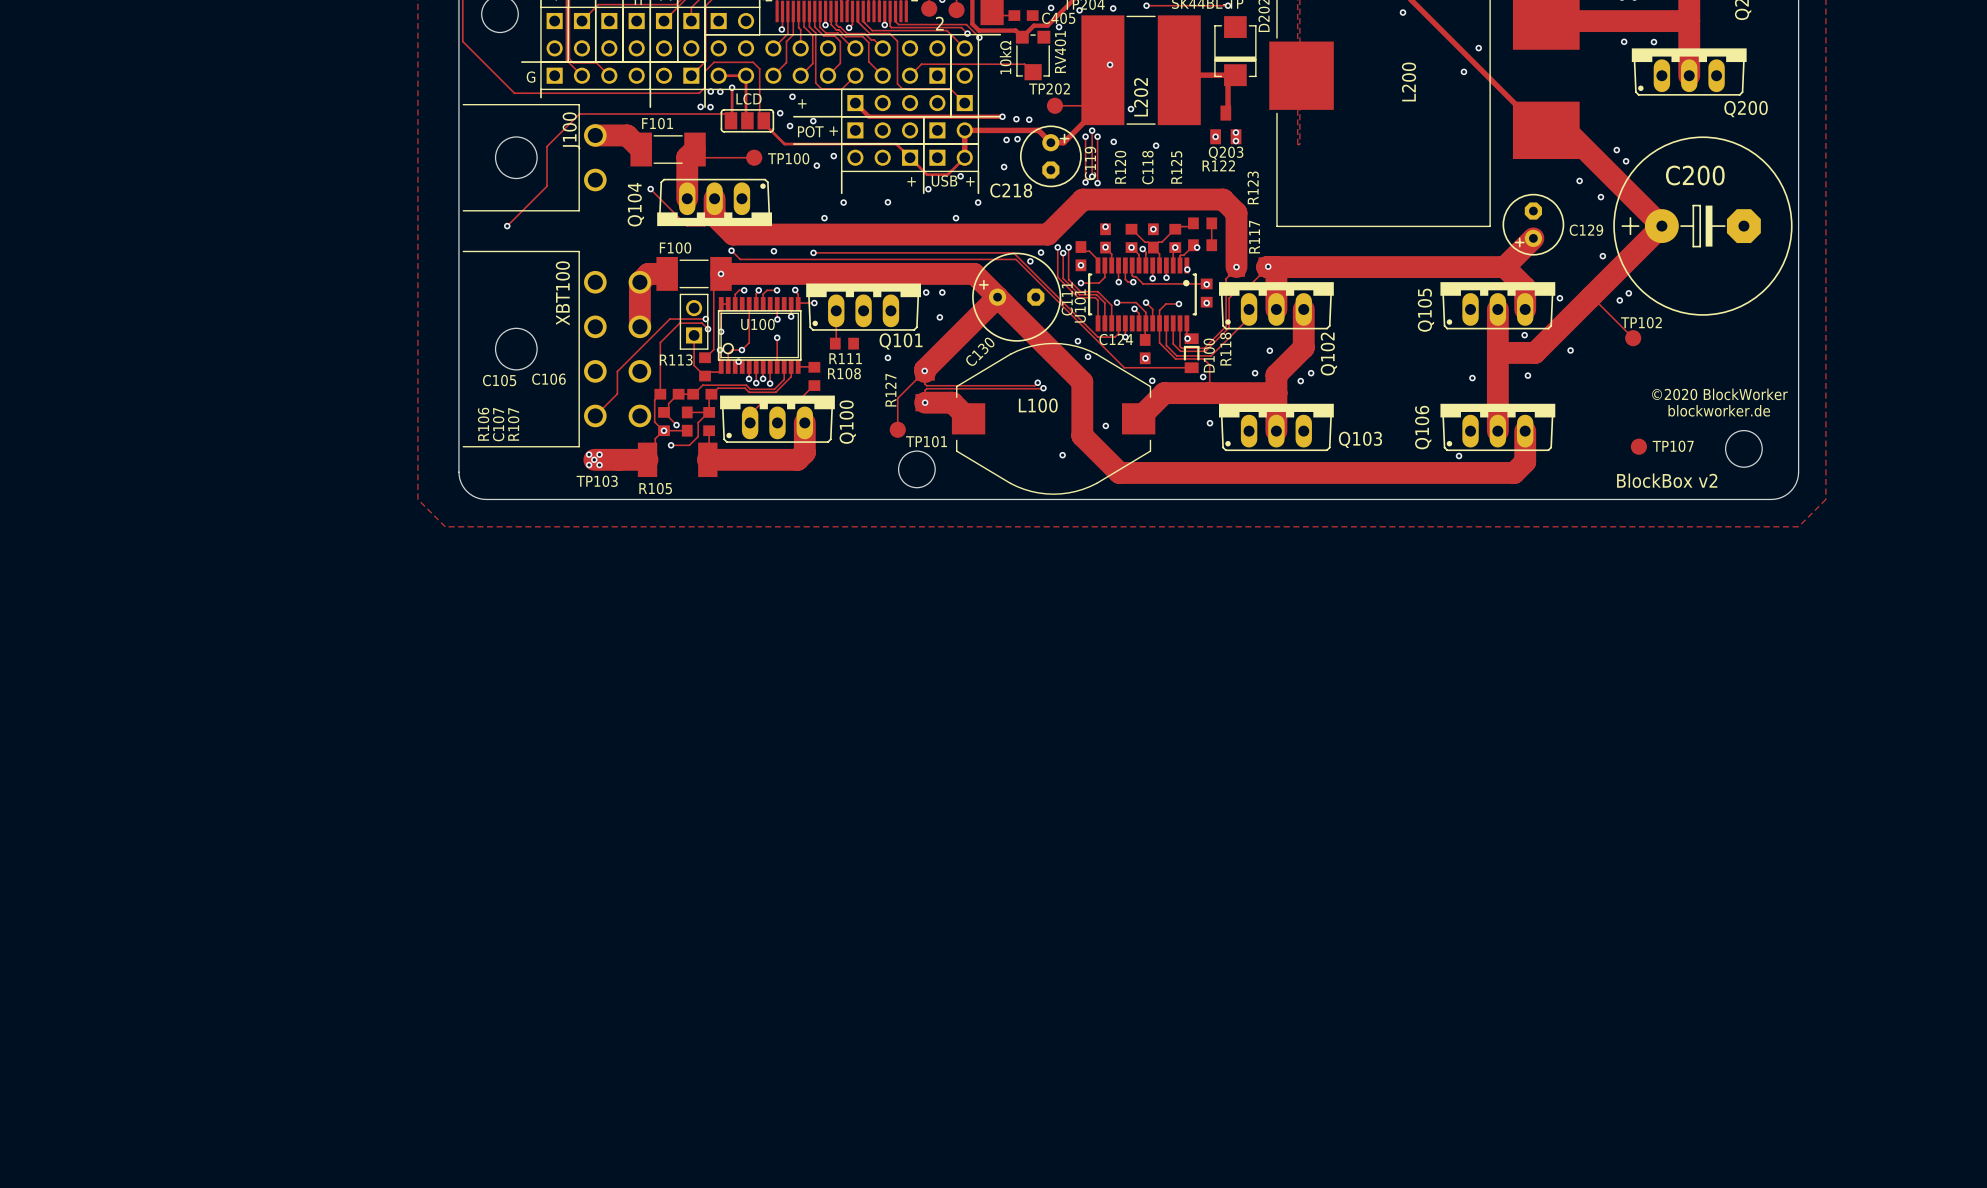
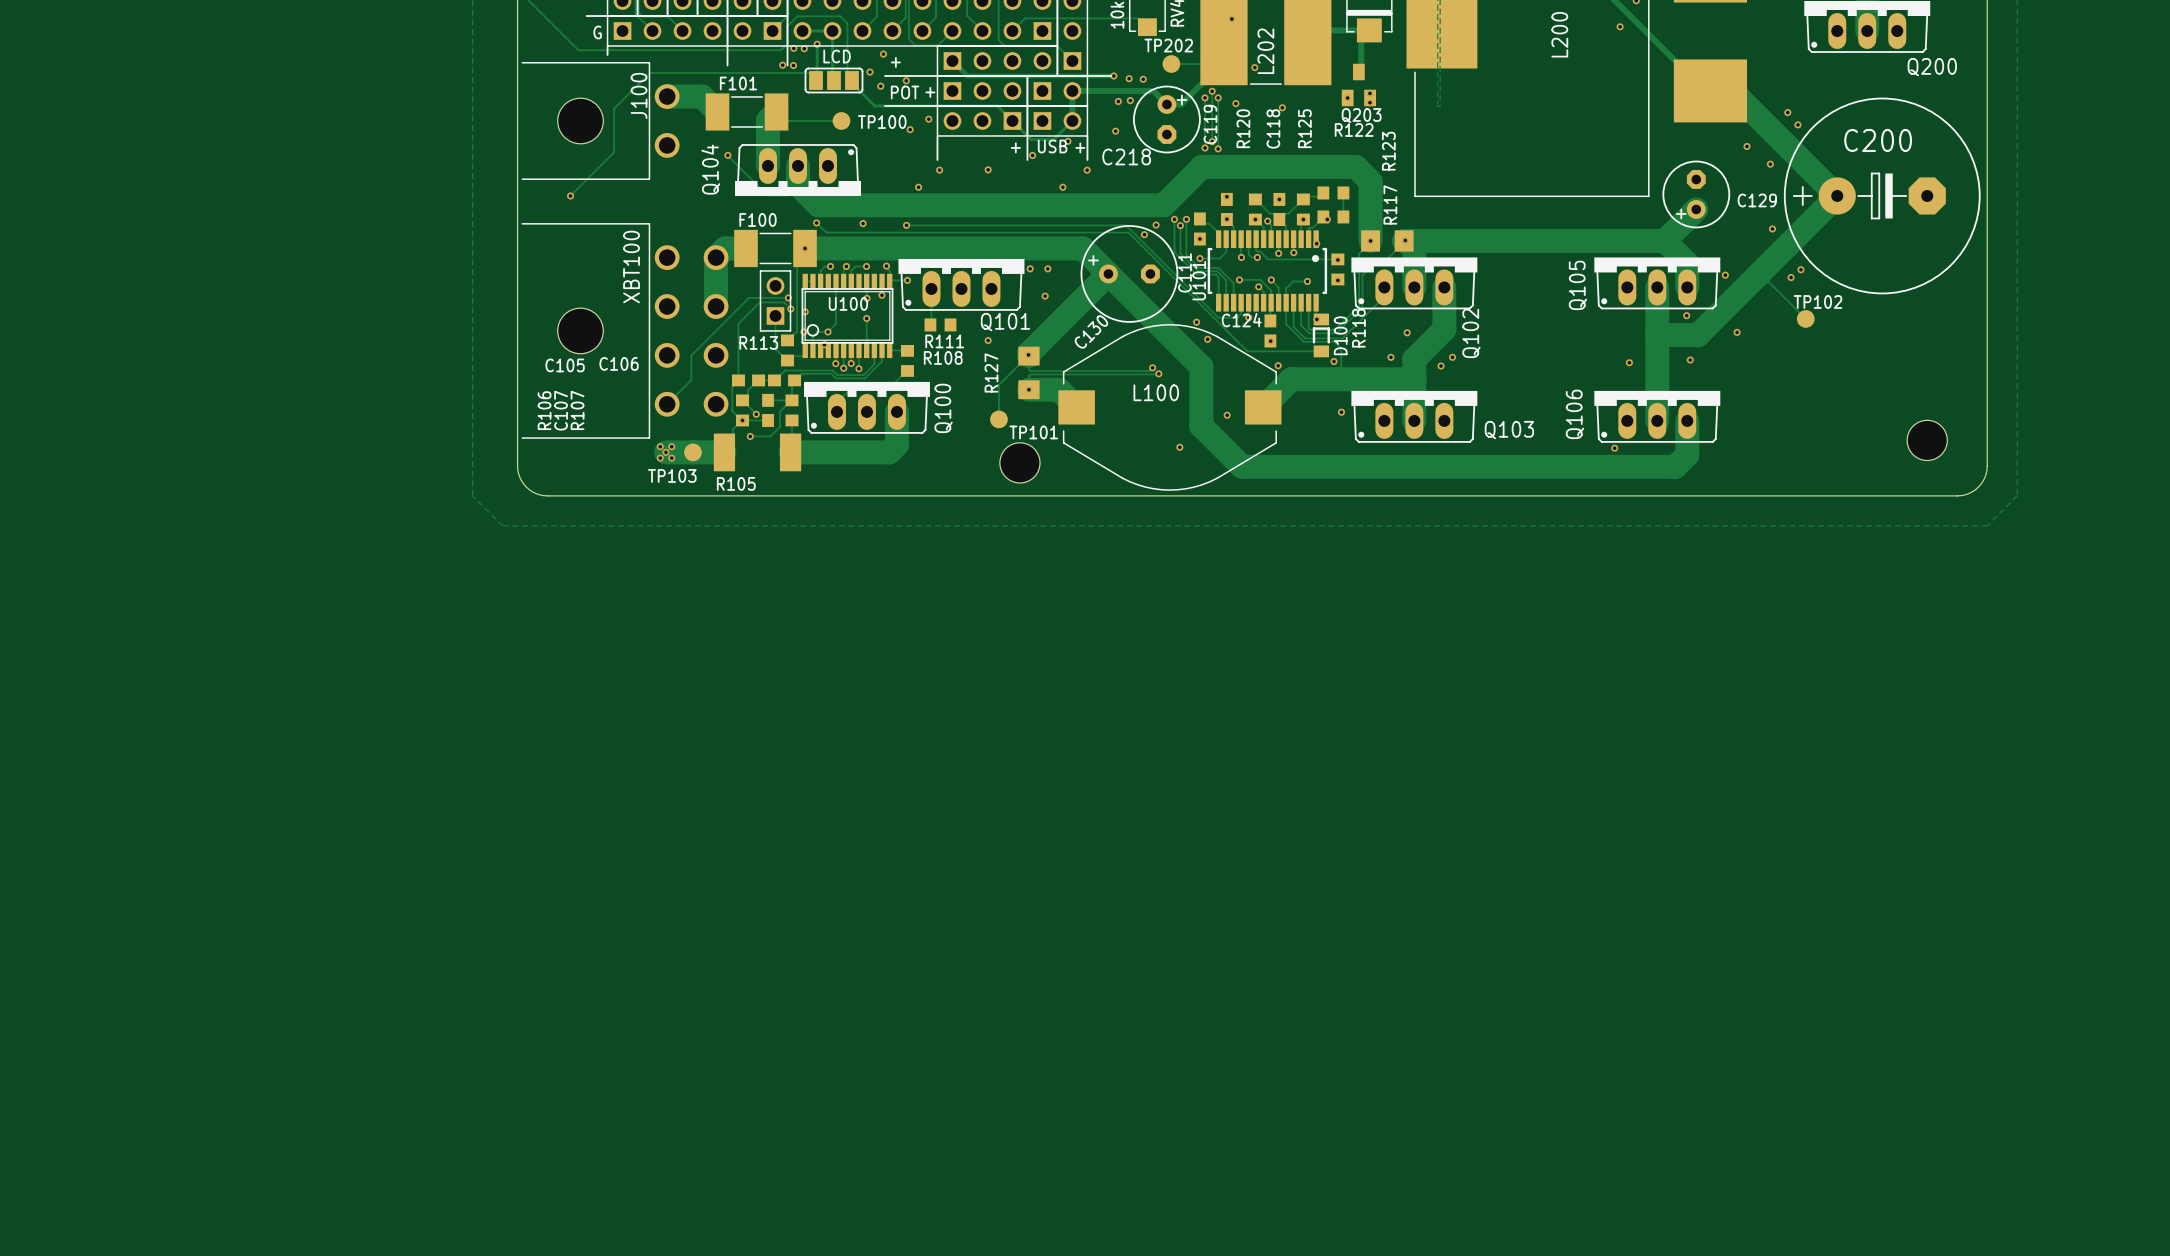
text: ©2020 BlockWorker (1719, 394) -> none
text: blockworker.de (1719, 410) -> none
TP107: (1638, 446) -> none
text: BlockBox v2 (1667, 480) -> none

